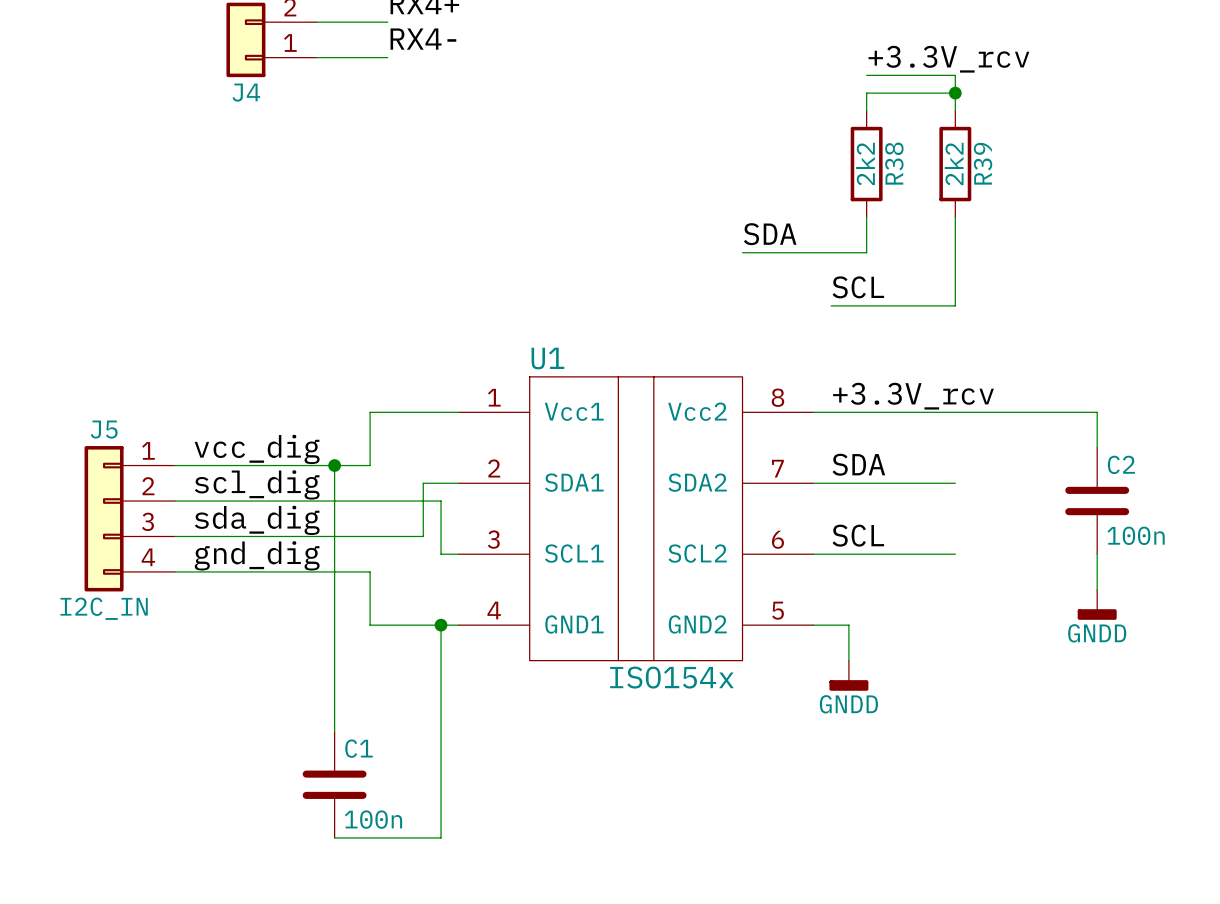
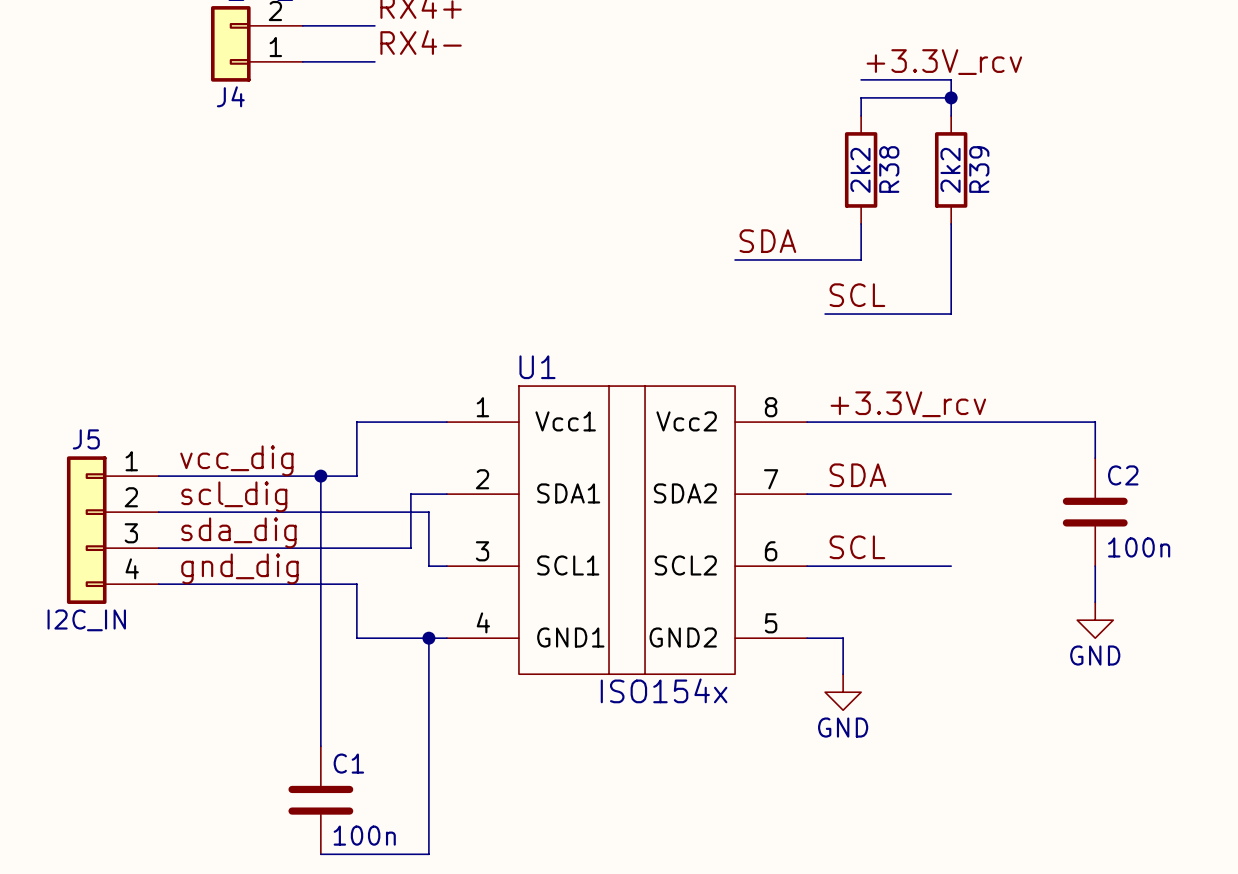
power symbol: GNDD (1097, 604) -> GND (1095, 620)
power symbol: GNDD (848, 675) -> GND (843, 692)

